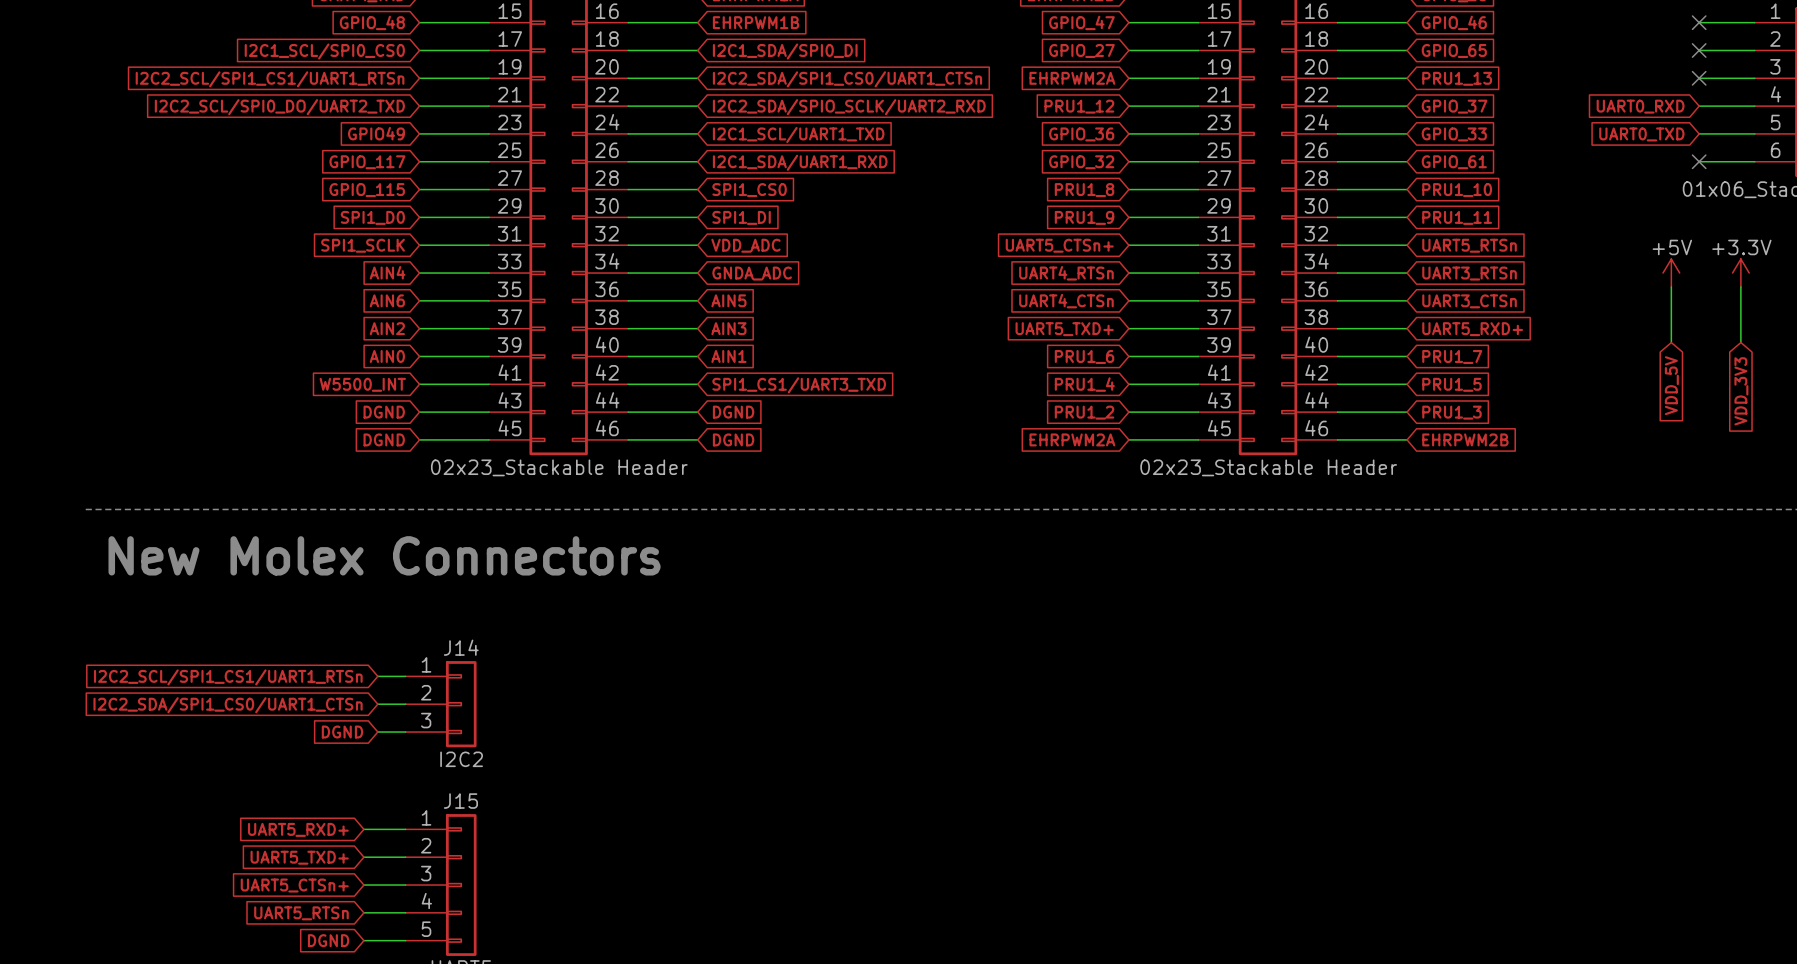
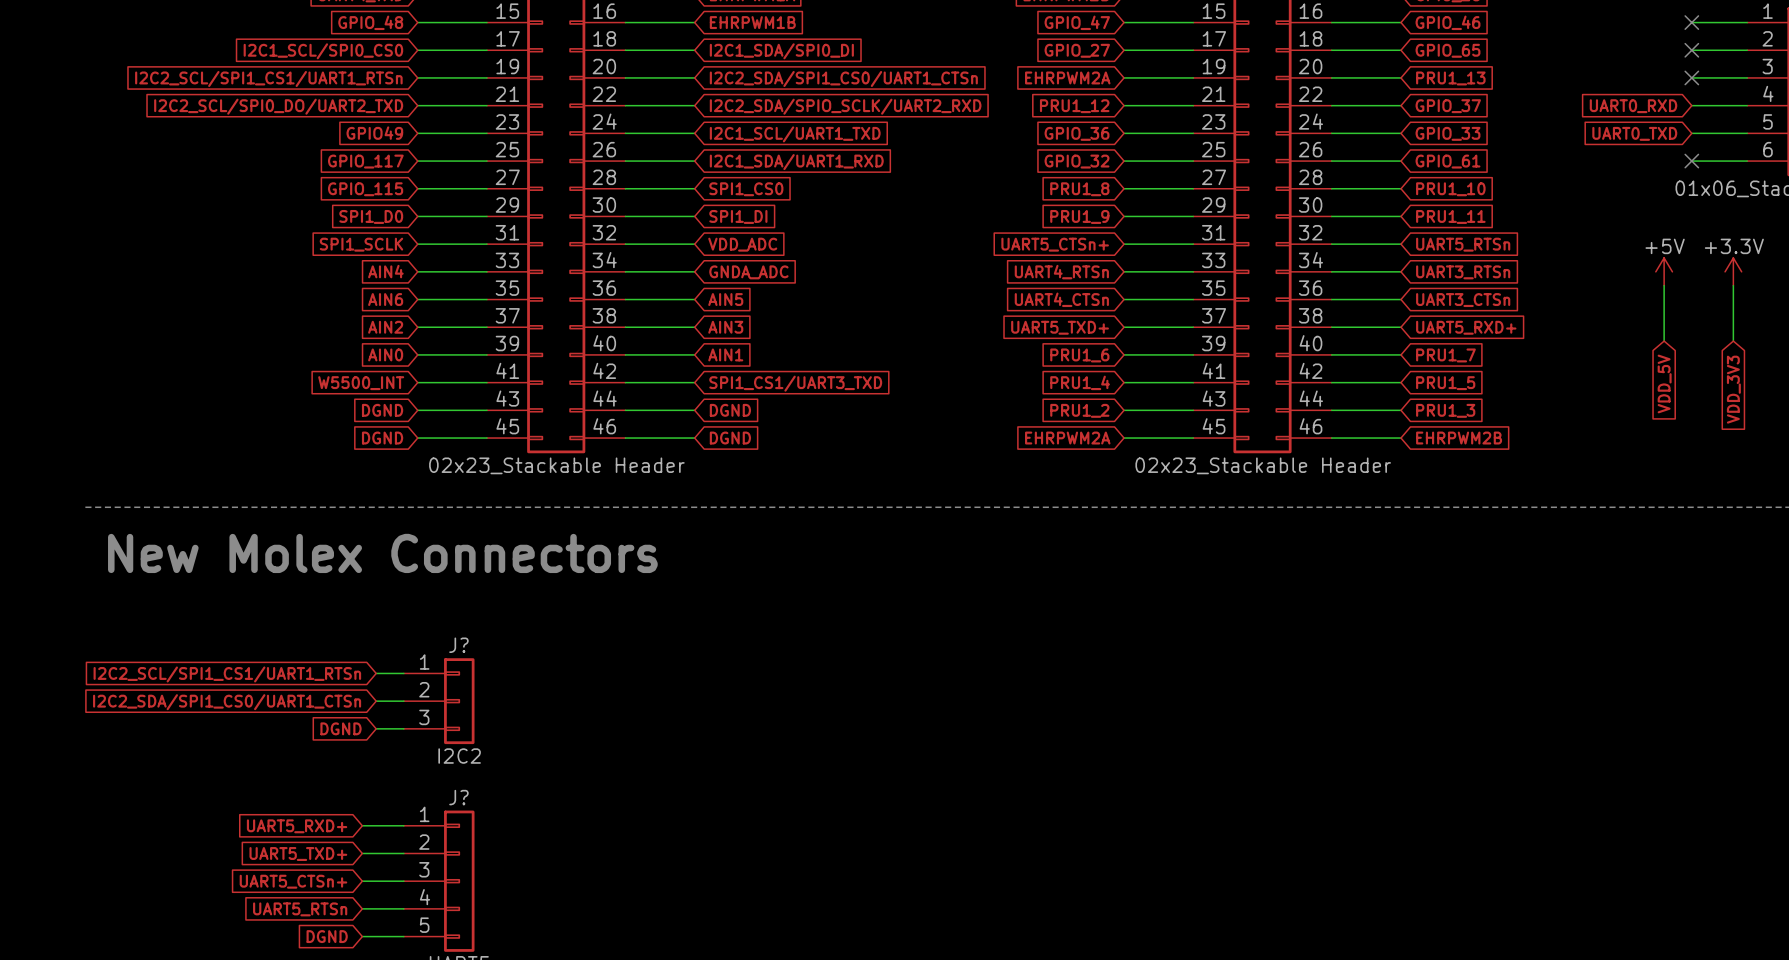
J14 name: J14 (461, 647) -> J? (458, 645)
J15 name: J15 (460, 801) -> J? (458, 797)

